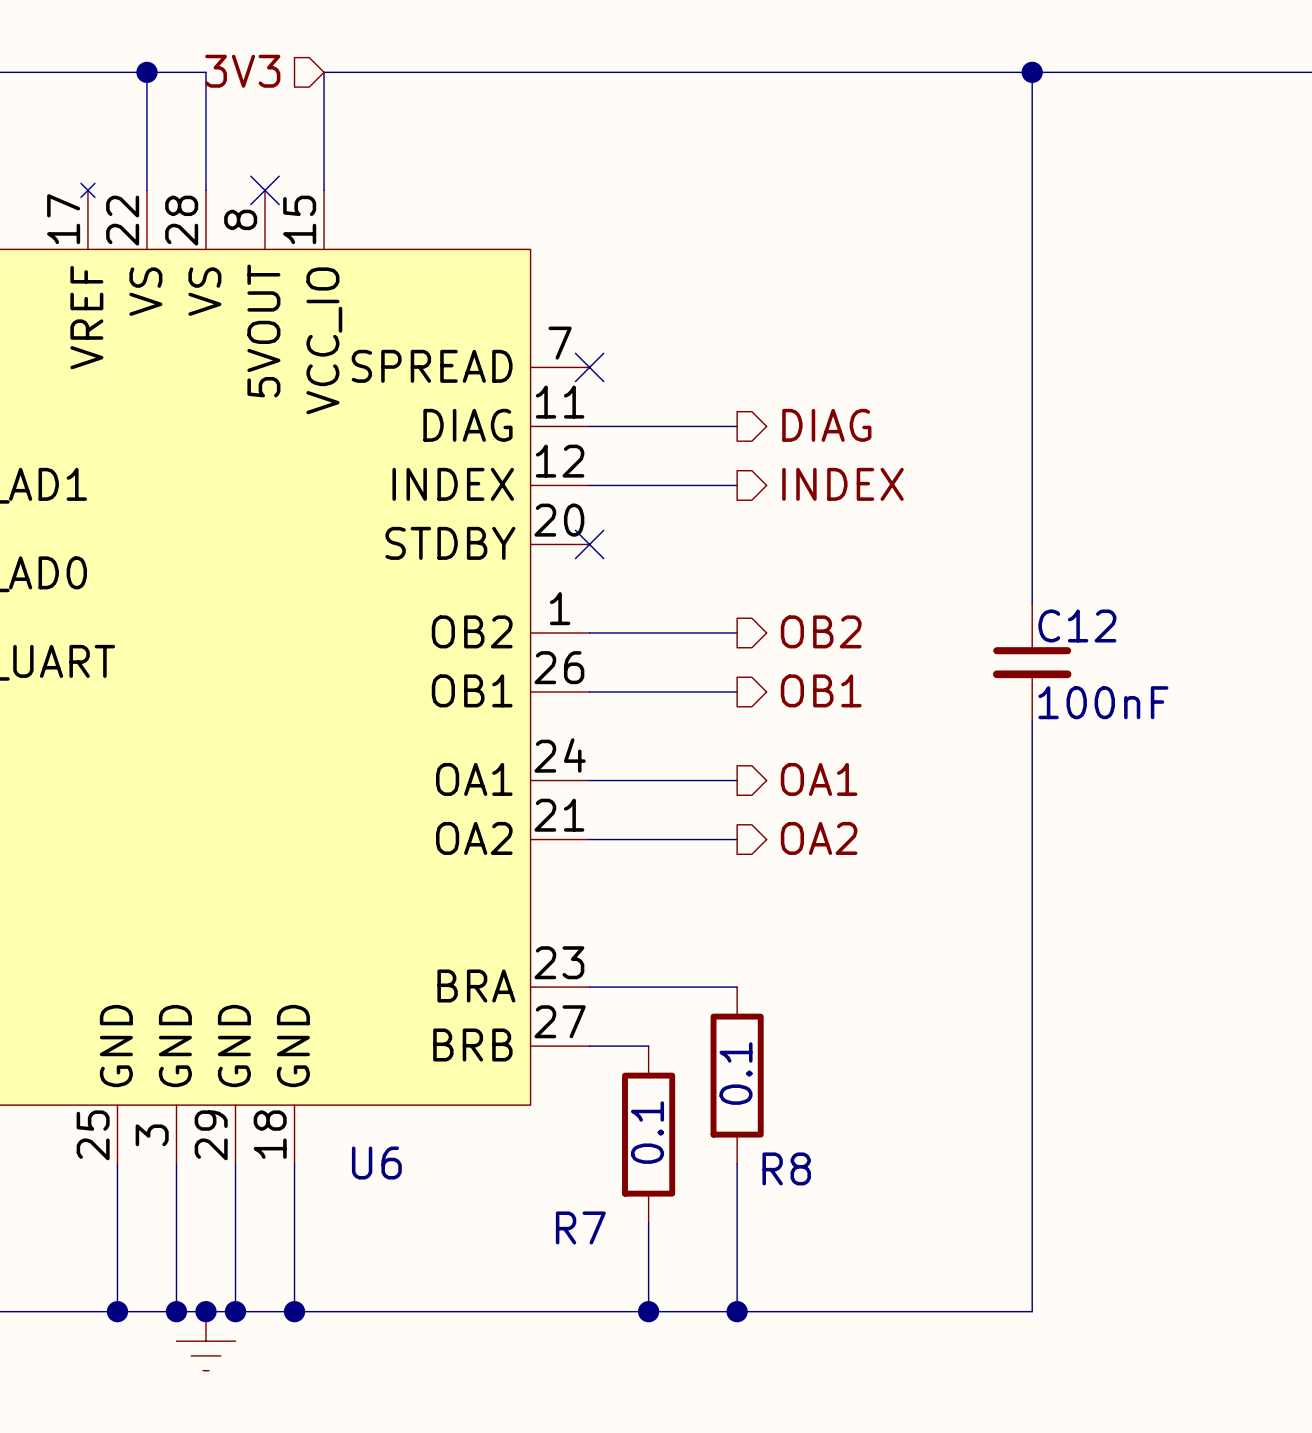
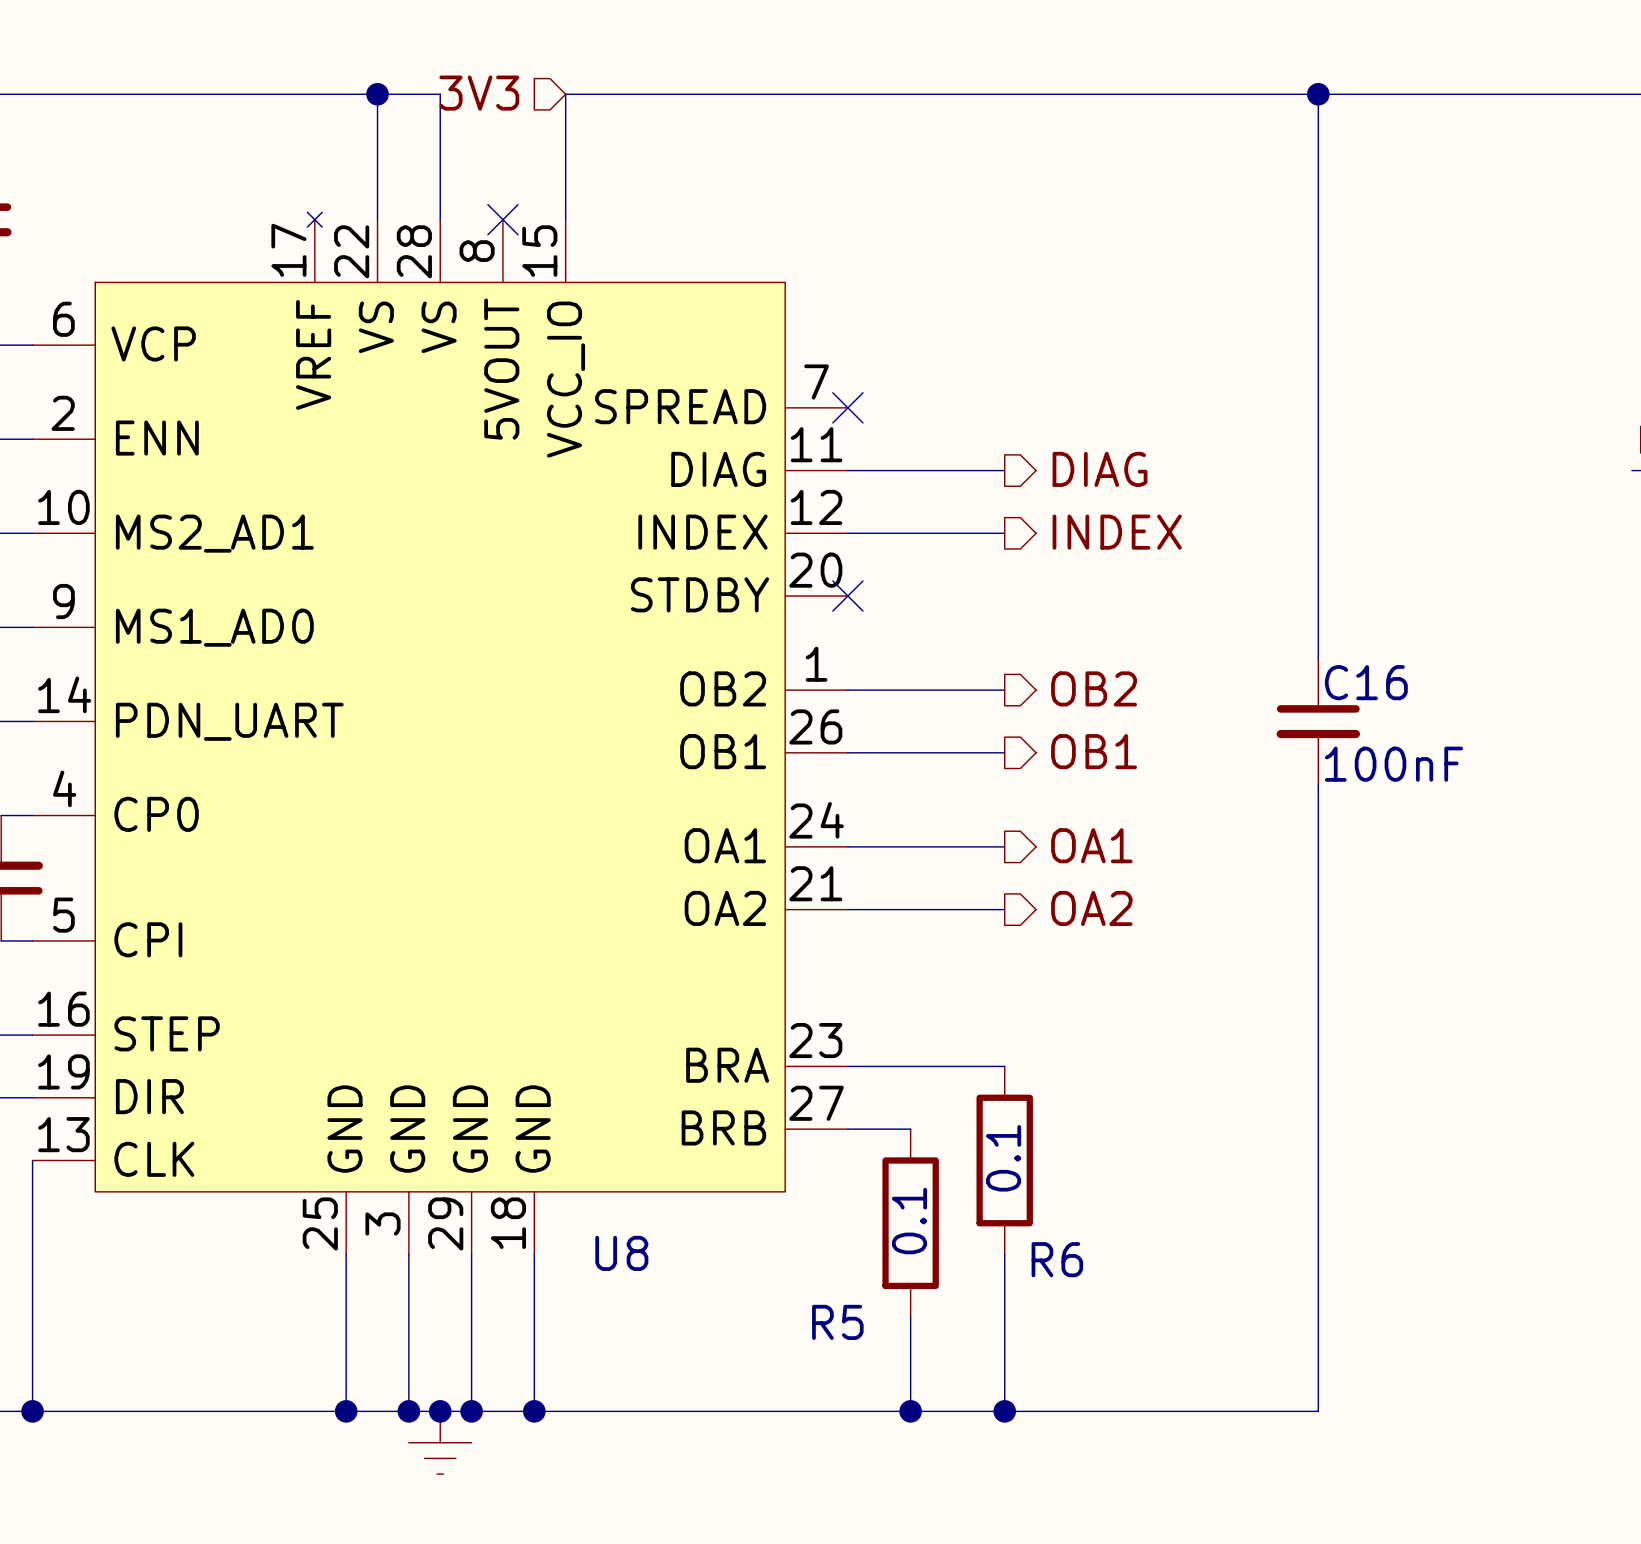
C12 name: C12 (1077, 625) -> C16 (1366, 682)
U6 name: U6 (376, 1163) -> U8 (621, 1253)
R8 name: R8 (786, 1168) -> R6 (1057, 1259)
R7 name: R7 (580, 1227) -> R5 (837, 1322)

